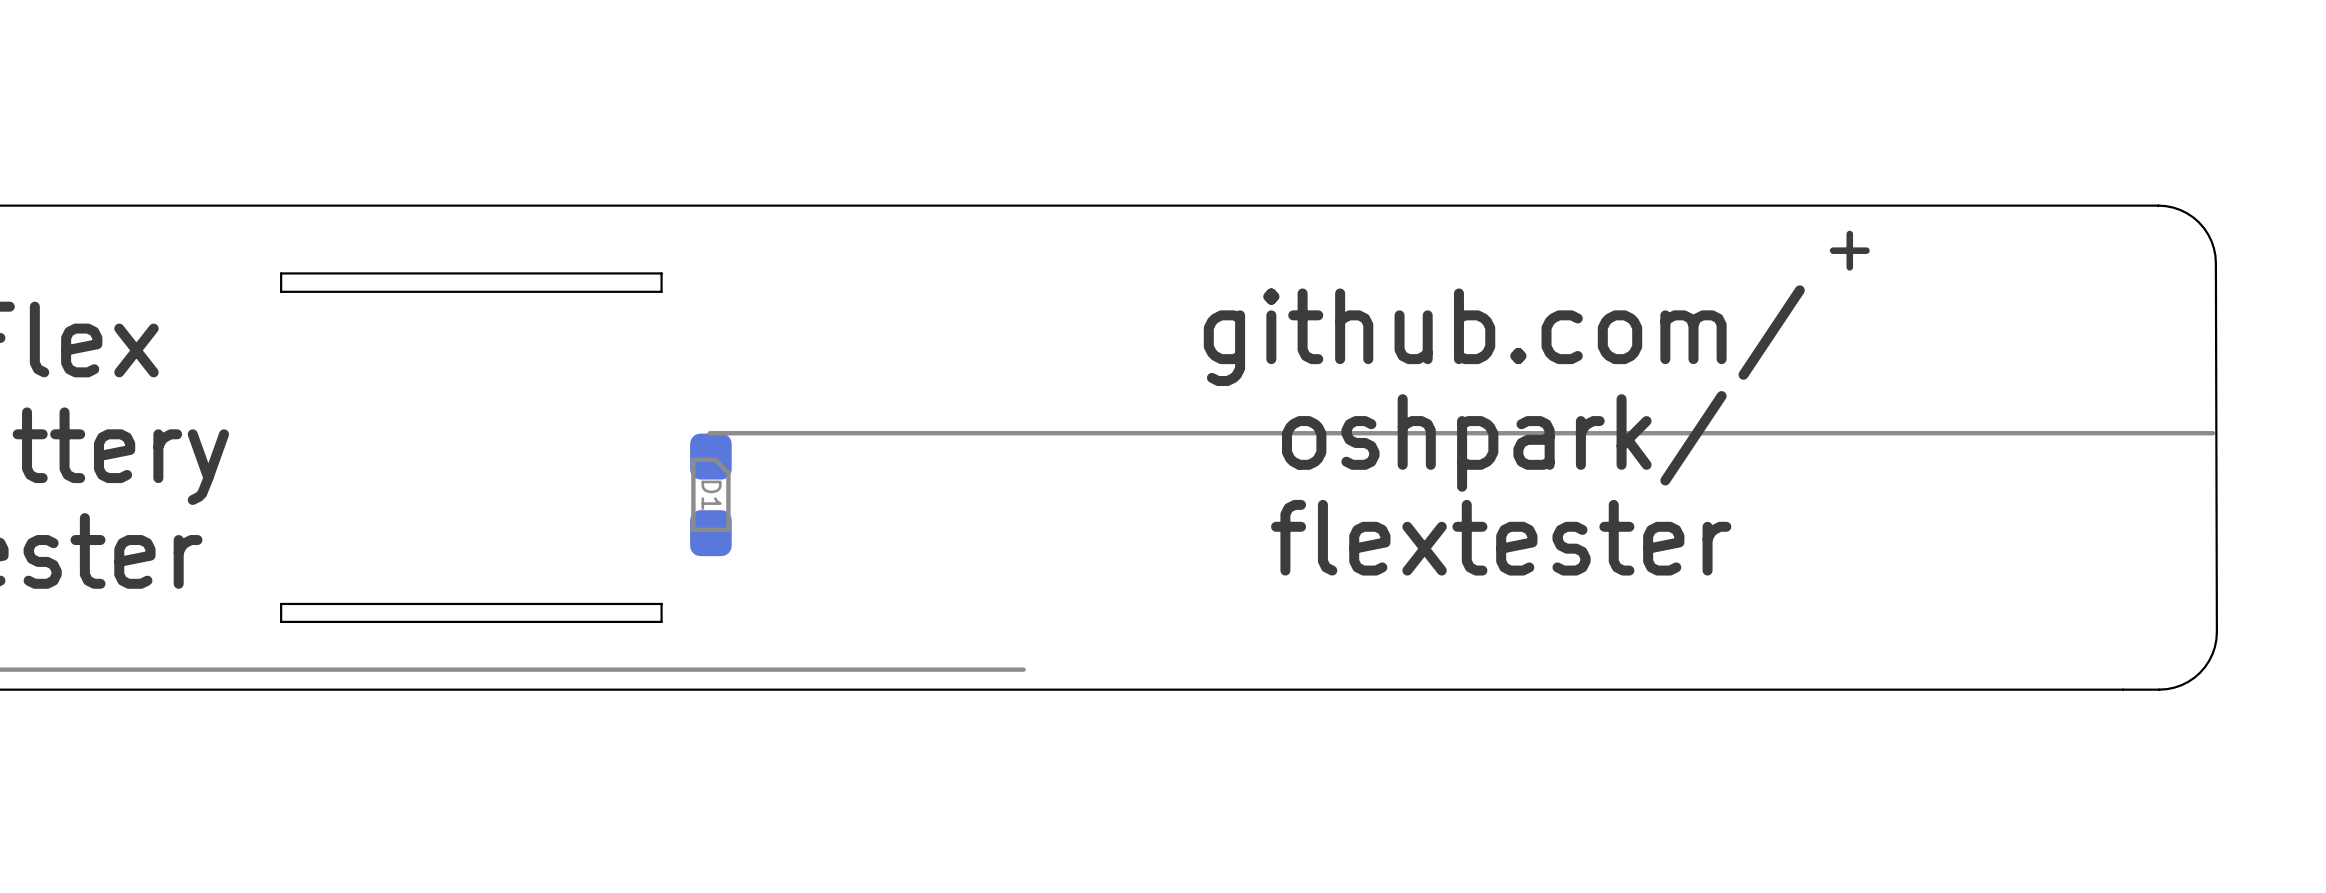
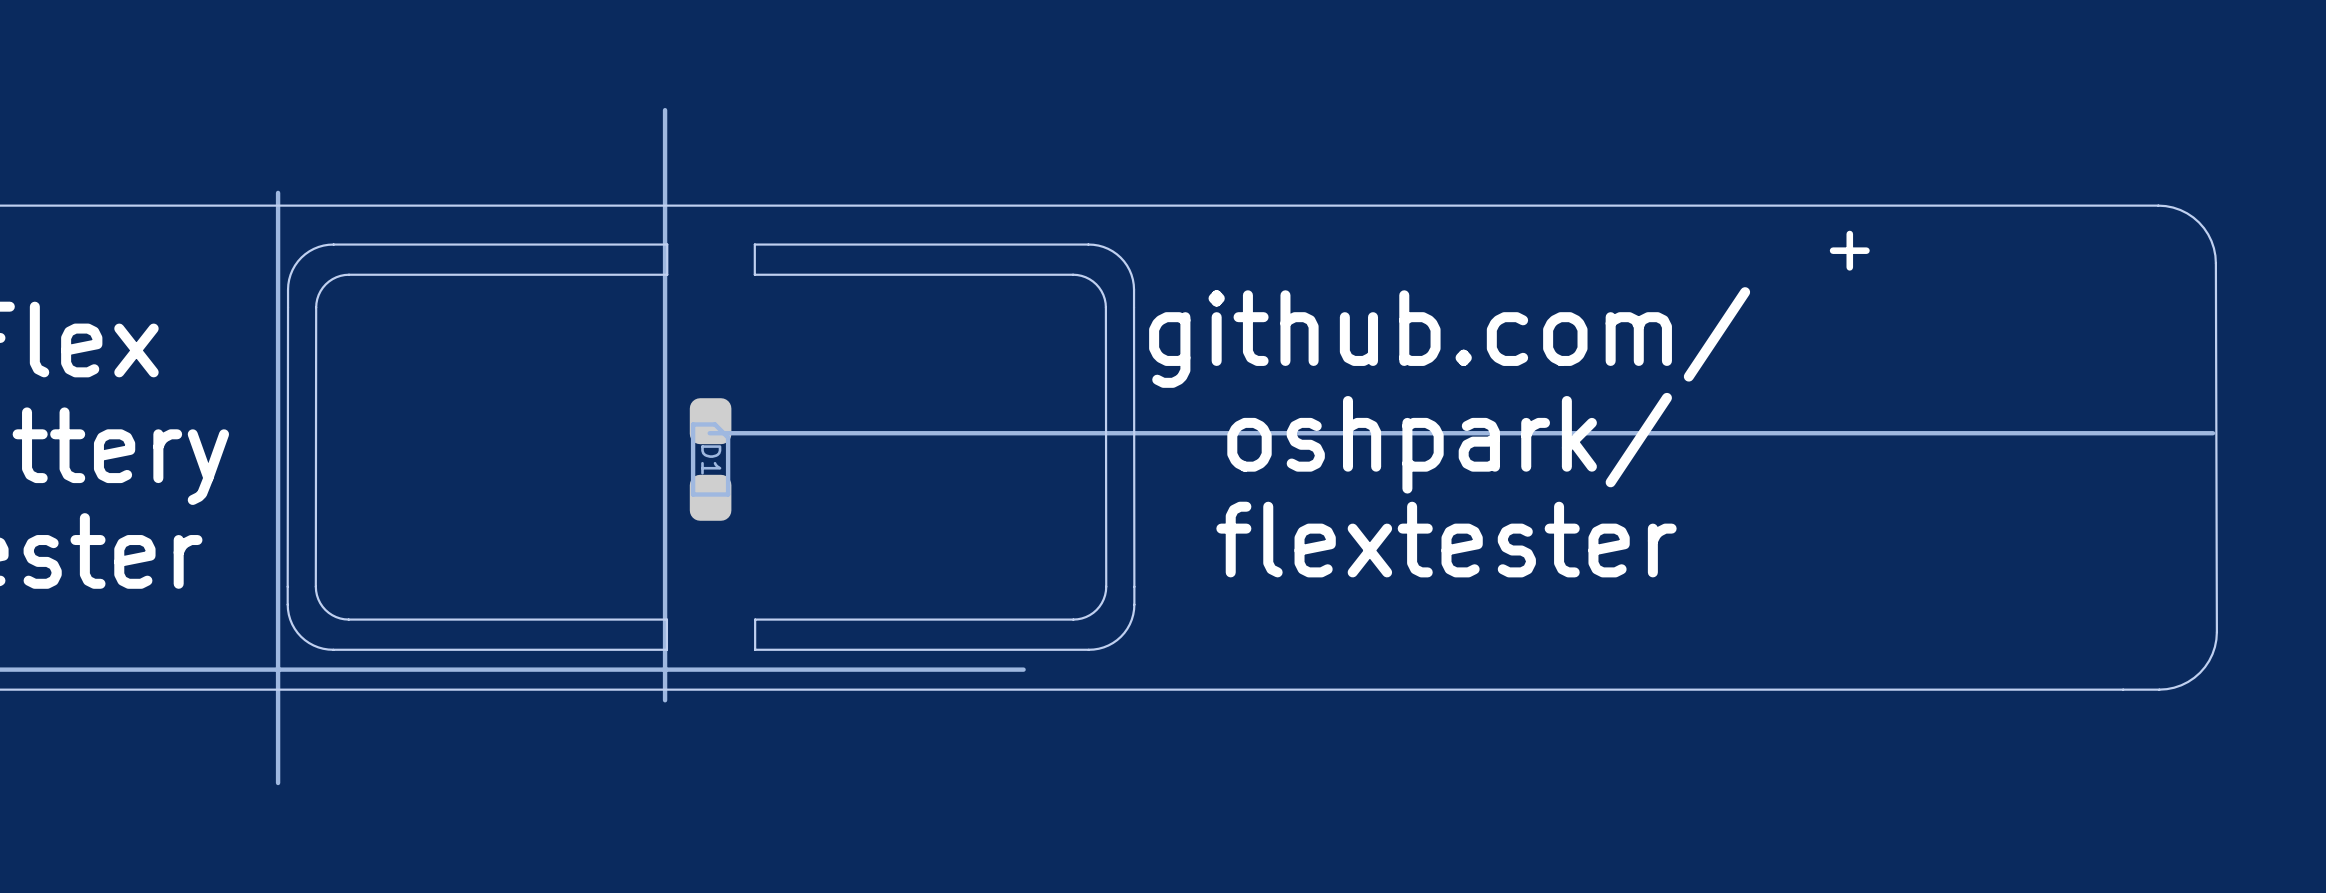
line: none -> (665, 110) (665, 700)
line: none -> (278, 192) (278, 783)
board edge: none -> (667, 244) (333, 244) (318, 246) (301, 257) (290, 274) (288, 289) (287, 586) (288, 614) (292, 624) (301, 636) (313, 645) (333, 649) (666, 649) (666, 619) (344, 619) (332, 615) (322, 606) (316, 595) (315, 586) (316, 307) (318, 295) (325, 284) (336, 277) (349, 274) (667, 274) (667, 244)
board edge: none -> (1088, 244) (754, 244) (754, 274) (1073, 274) (1085, 277) (1096, 284) (1103, 295) (1105, 307) (1106, 586) (1103, 599) (1096, 609) (1089, 615) (1077, 619) (755, 619) (755, 649) (1088, 649) (1108, 645) (1124, 632) (1131, 619) (1134, 604) (1133, 284) (1129, 269) (1120, 257) (1108, 248) (1088, 244)
board edge: (661, 273) (661, 291) (281, 291) (281, 273) (661, 273) -> none
text position: github.com/ (1504, 335) -> github.com/ (1449, 337)
text position: oshpark/ (1504, 441) -> oshpark/ (1449, 443)
D1 position: (710, 494) -> (710, 459)
text position: flextester (1501, 537) -> flextester (1446, 539)
board edge: (661, 603) (661, 621) (281, 621) (281, 603) (661, 603) -> none

